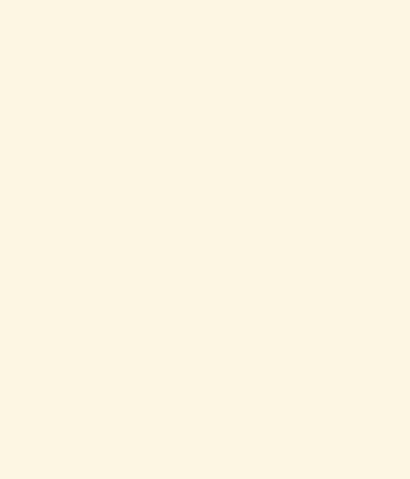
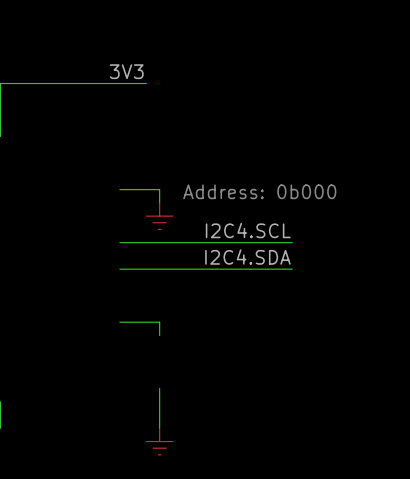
label: none -> 3V3 (126, 71)
wire: none -> (146, 83) (0, 83) (0, 136)
wire: none -> (119, 189) (159, 189) (159, 202)
text: none -> Address: 0b000 (259, 191)
power symbol: none -> (159, 216)
label: none -> I2C4.SCL (248, 230)
wire: none -> (119, 242) (292, 242)
label: none -> I2C4.SDA (247, 257)
wire: none -> (119, 269) (292, 269)
wire: none -> (119, 322) (159, 322) (159, 335)
wire: none -> (159, 388) (159, 428)
wire: none -> (0, 401) (0, 428)
power symbol: none -> (159, 441)

